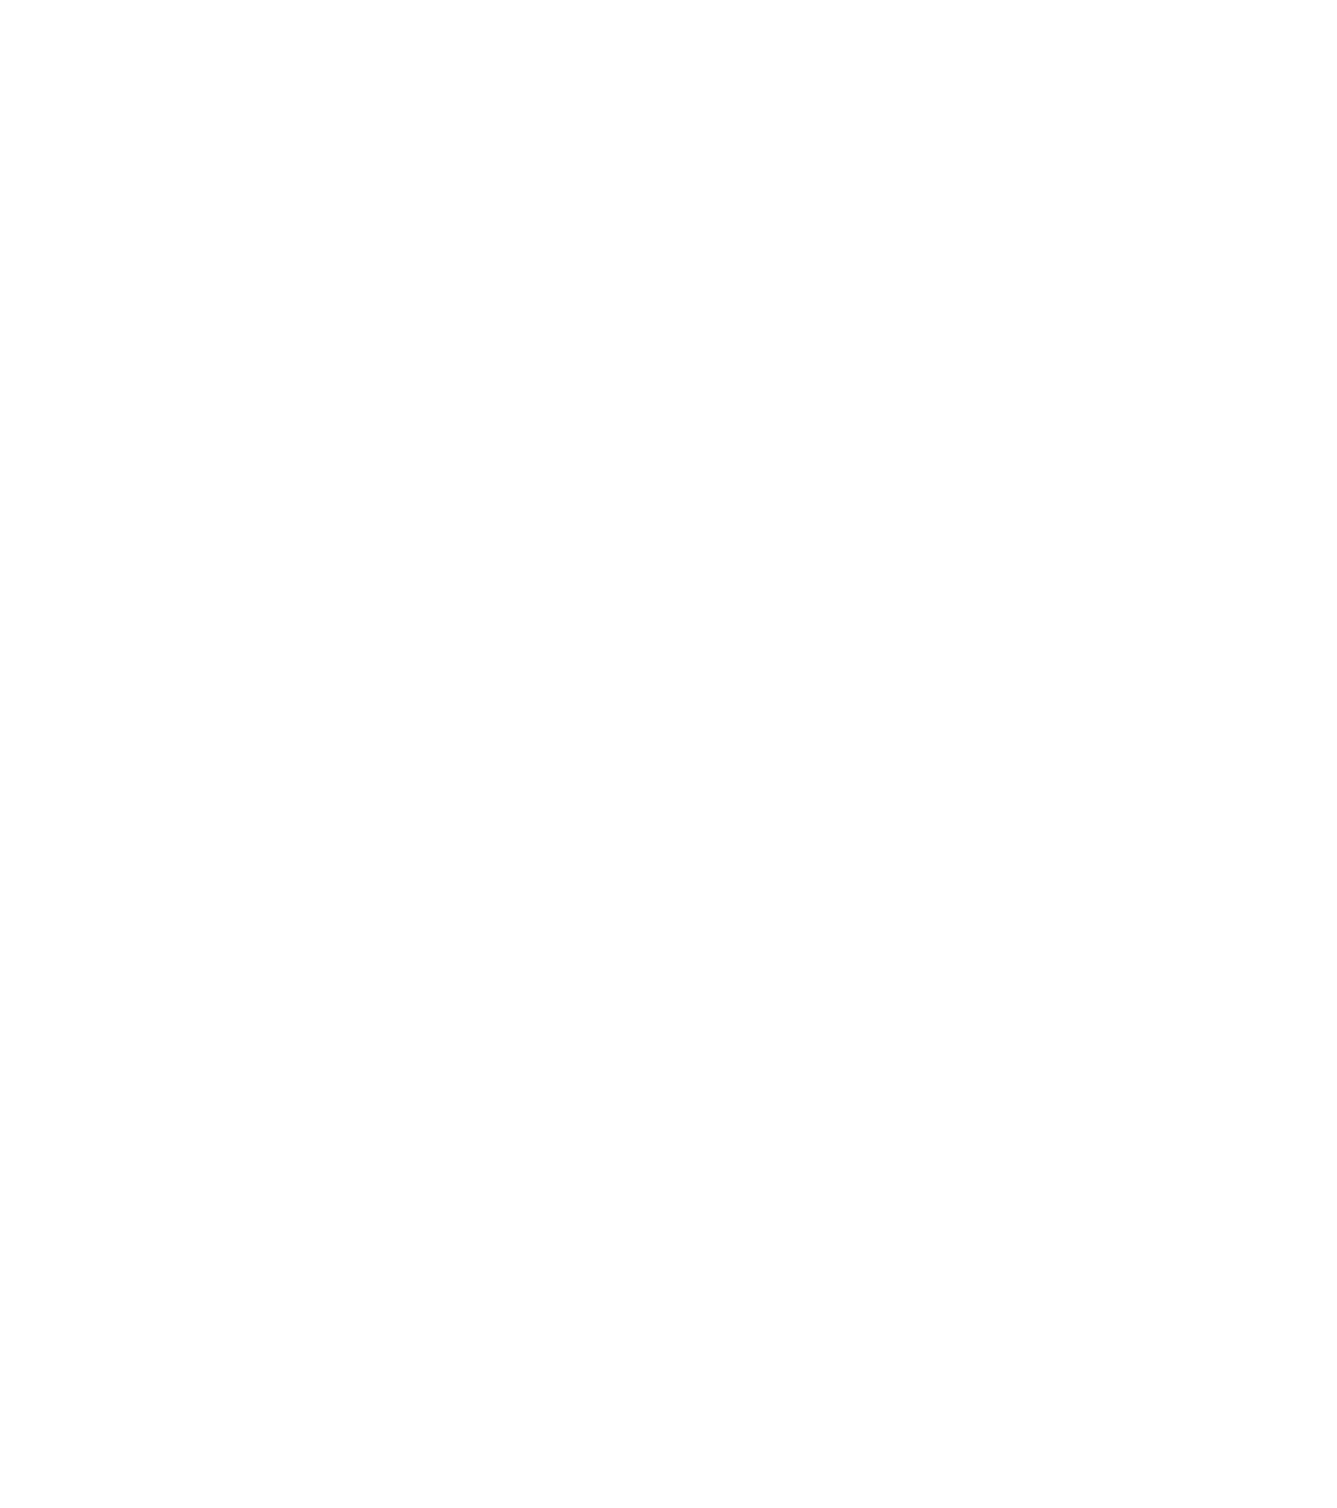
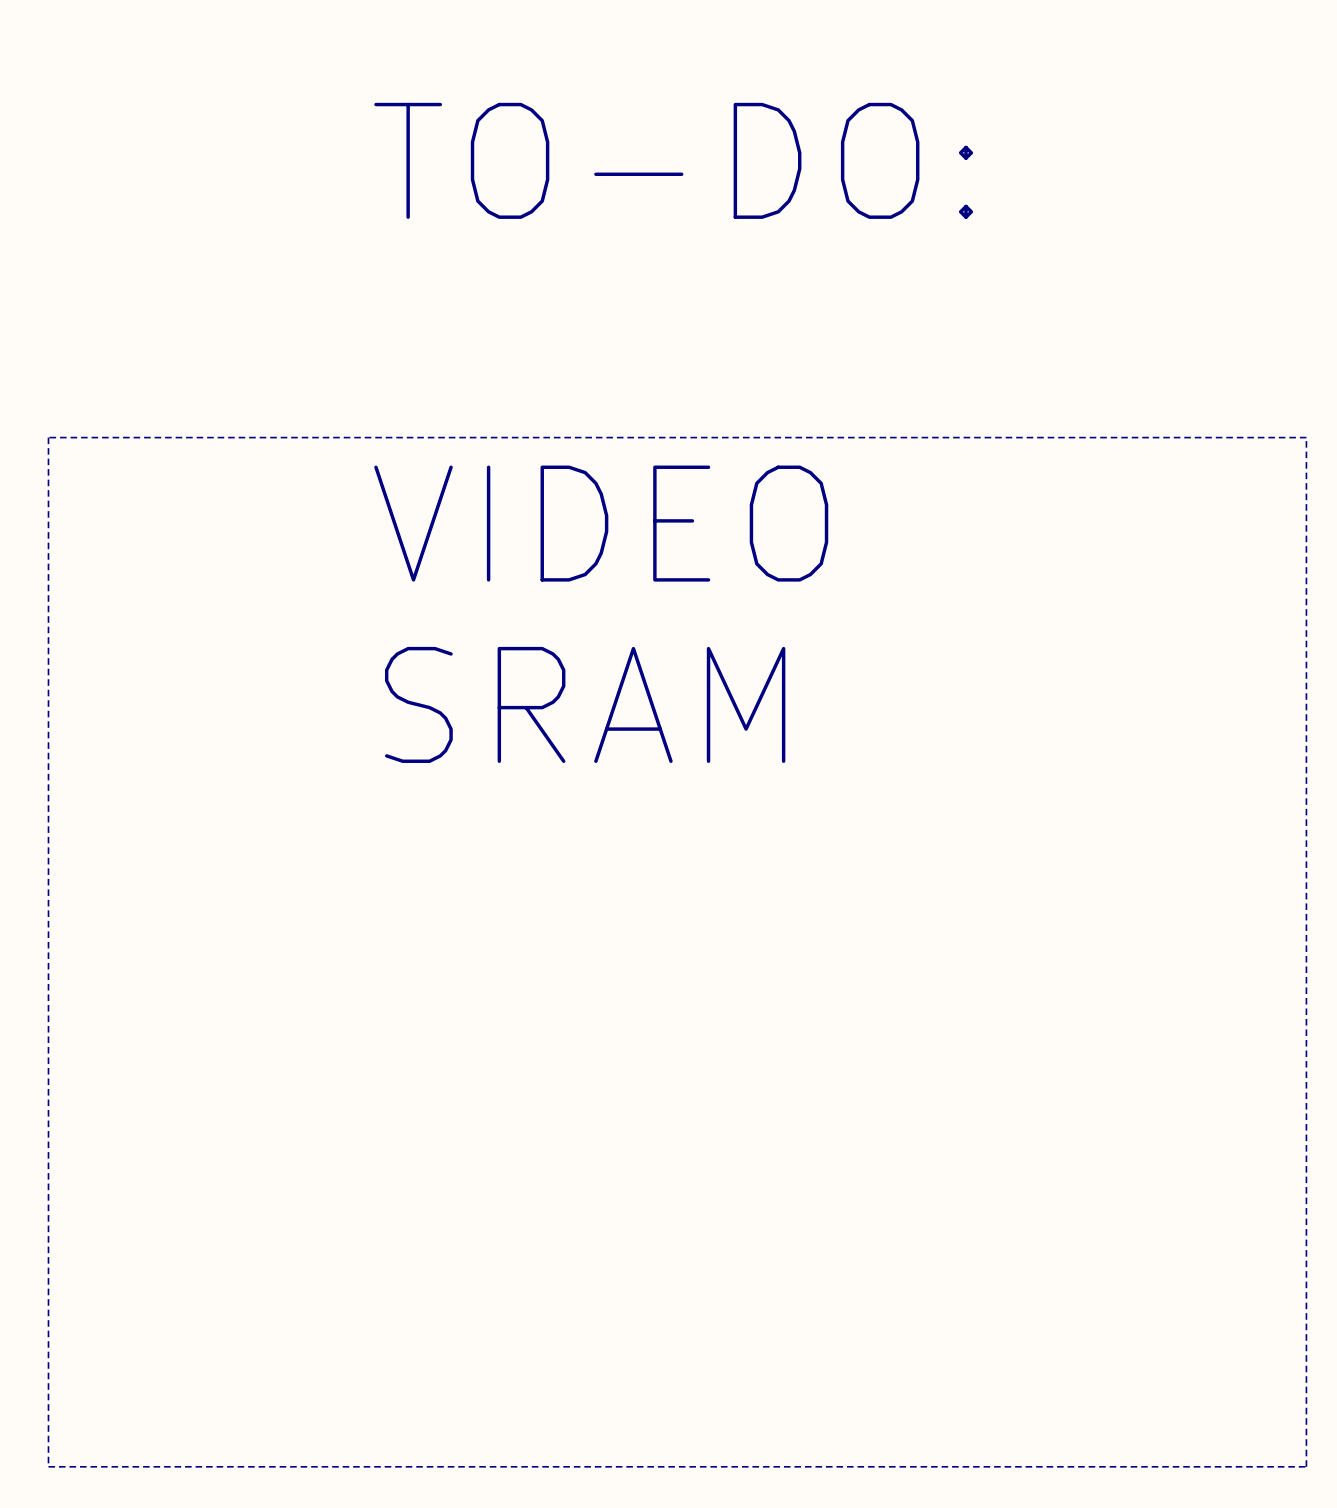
text: none -> TO-DO: (673, 160)
line: none -> (48, 437) (48, 1466) (1306, 1466) (1306, 437) (48, 437)
text: none -> VIDEO (601, 523)
text: none -> SRAM (585, 704)

